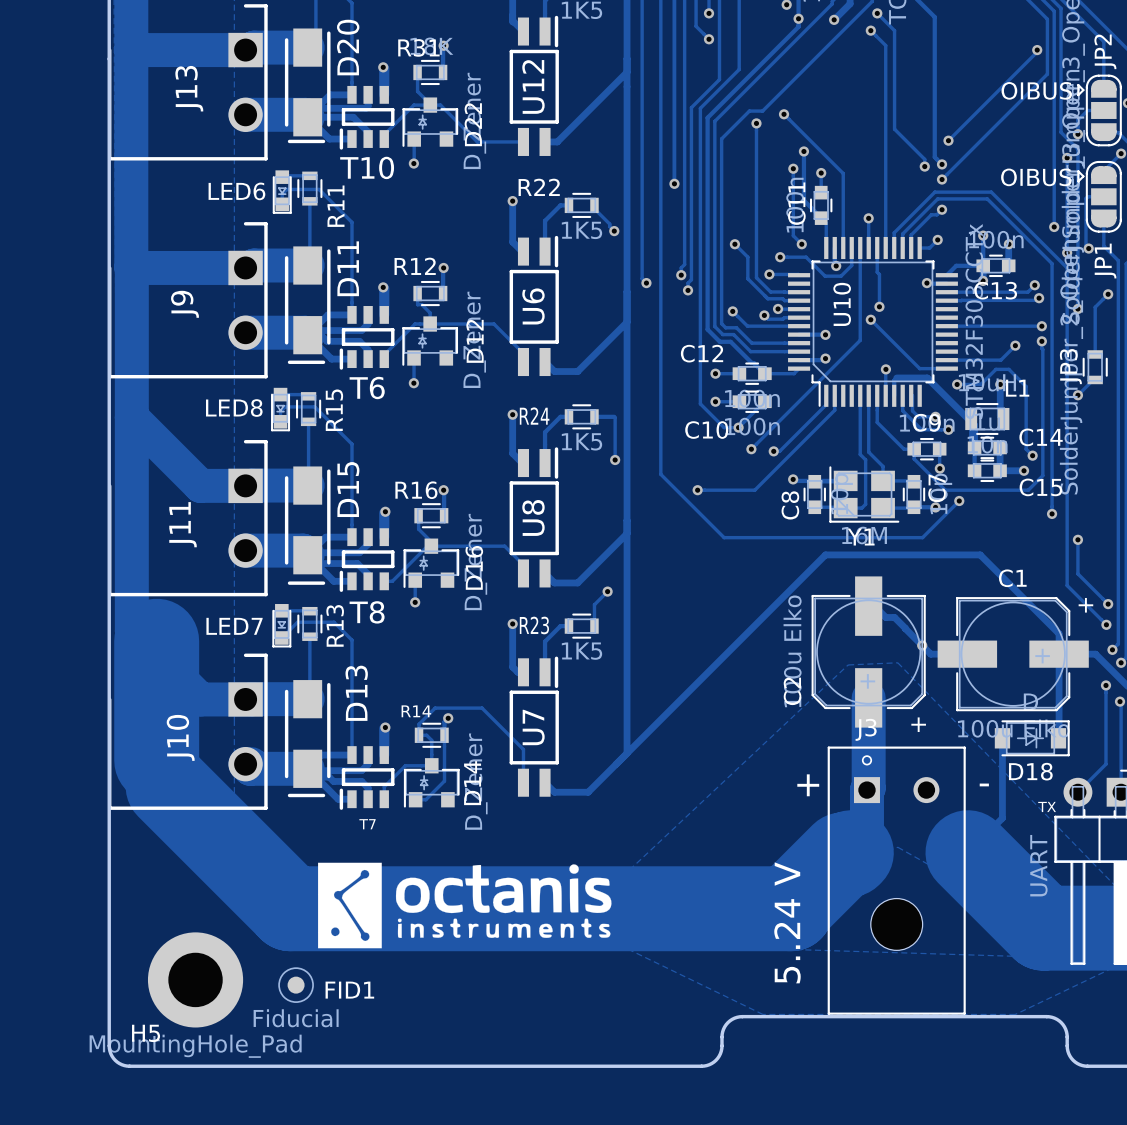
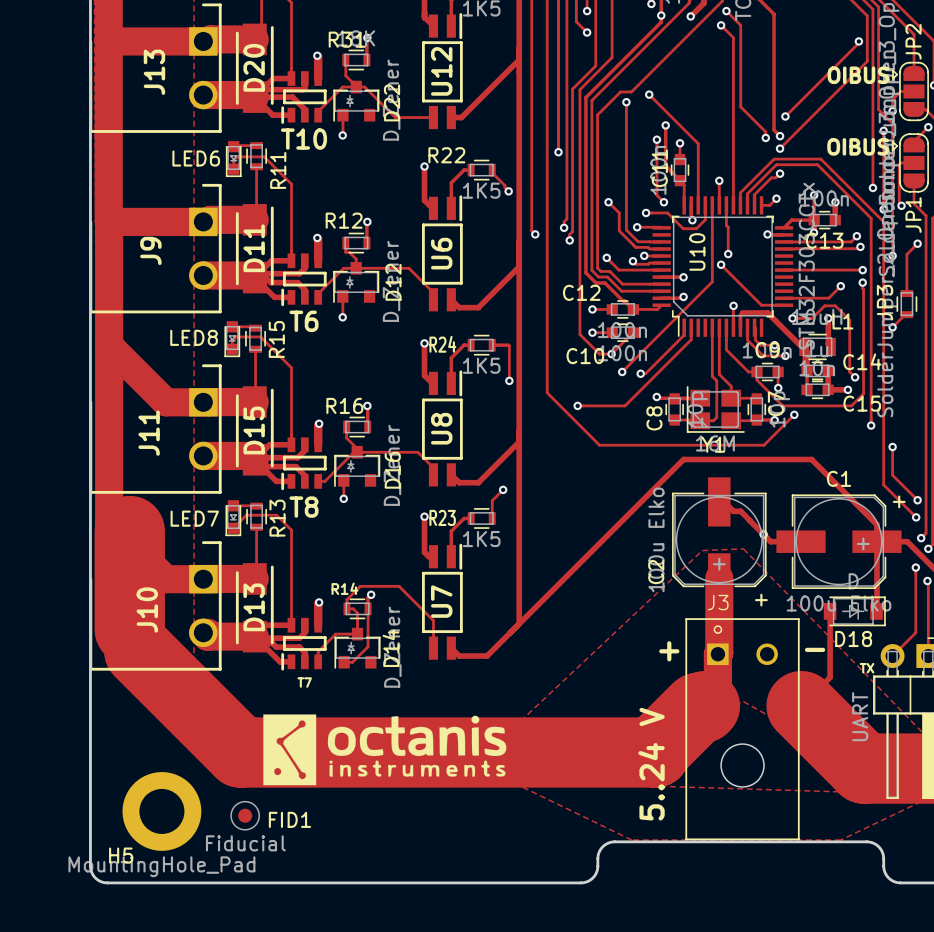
D20 name position: D20 (348, 47) -> D20 (254, 67)
line: (289, 141) (323, 141) -> none
D11 name position: D11 (348, 268) -> D11 (254, 248)
line: (289, 362) (323, 362) -> none
D15 name position: D15 (348, 489) -> D15 (254, 430)
line: (289, 583) (323, 583) -> none
D13 name position: D13 (356, 693) -> D13 (254, 607)
line: (289, 795) (323, 795) -> none

